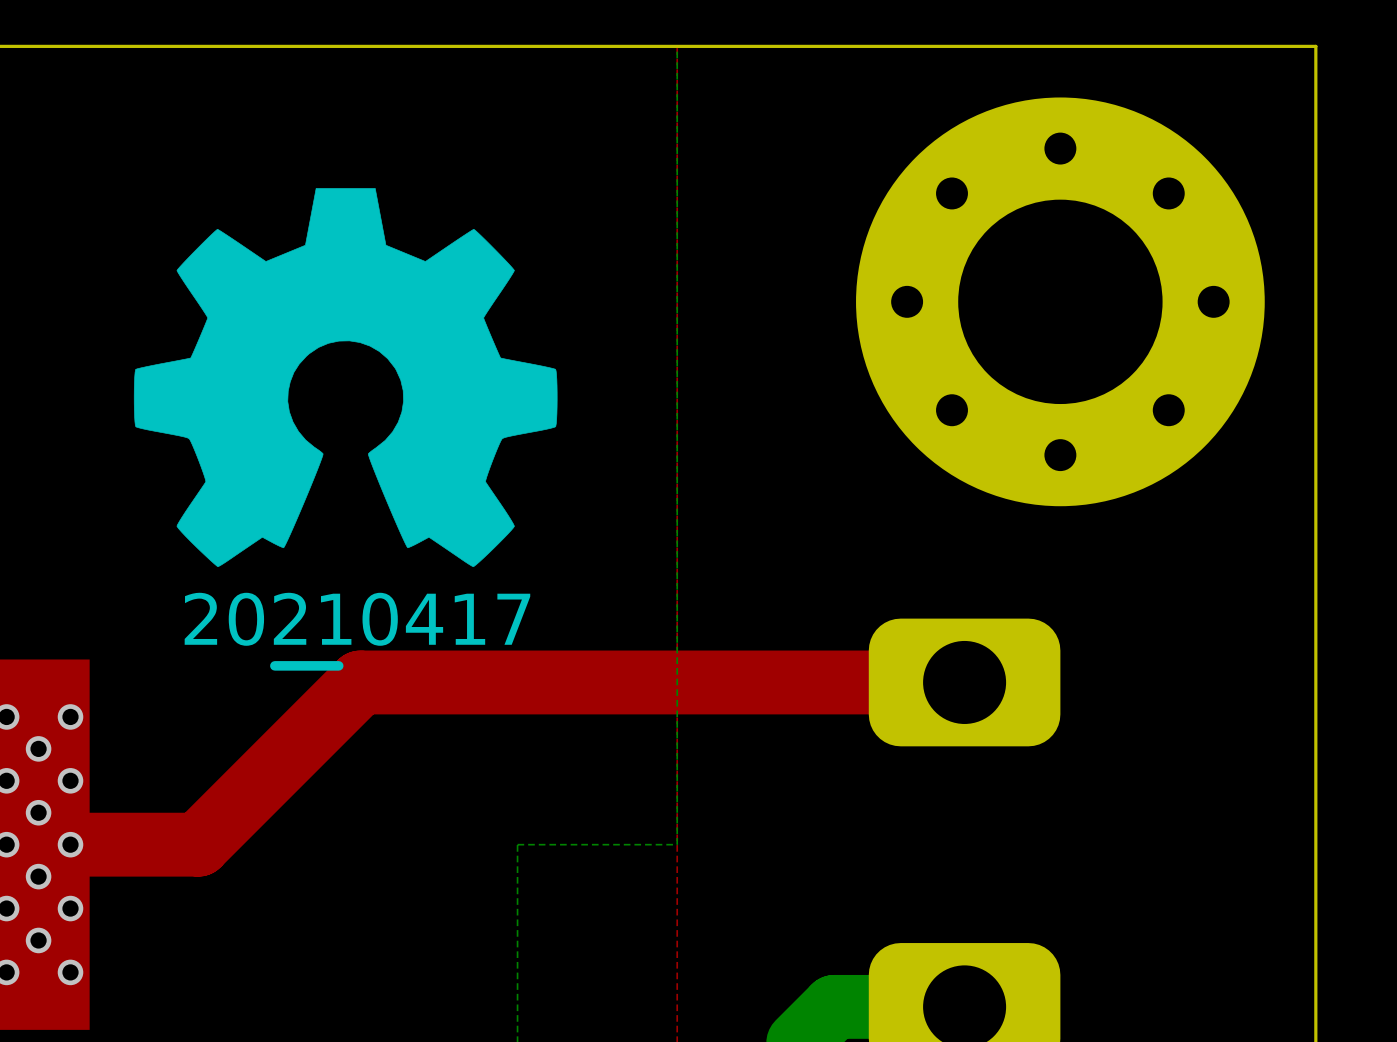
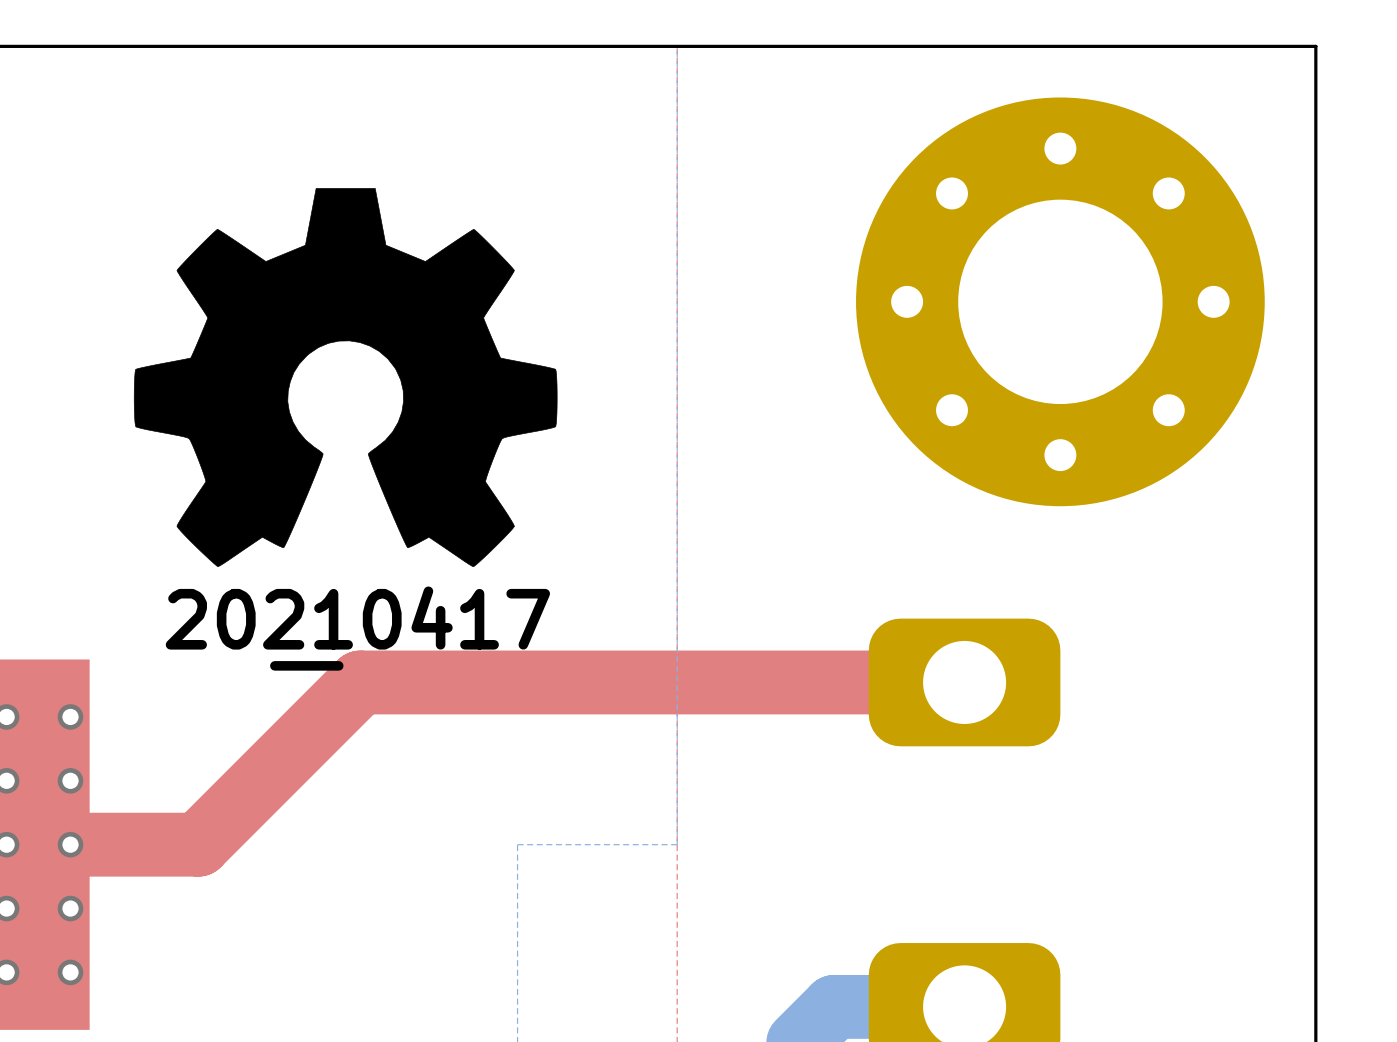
via: (38, 748) -> none
via: (38, 812) -> none
via: (38, 876) -> none
via: (38, 940) -> none

